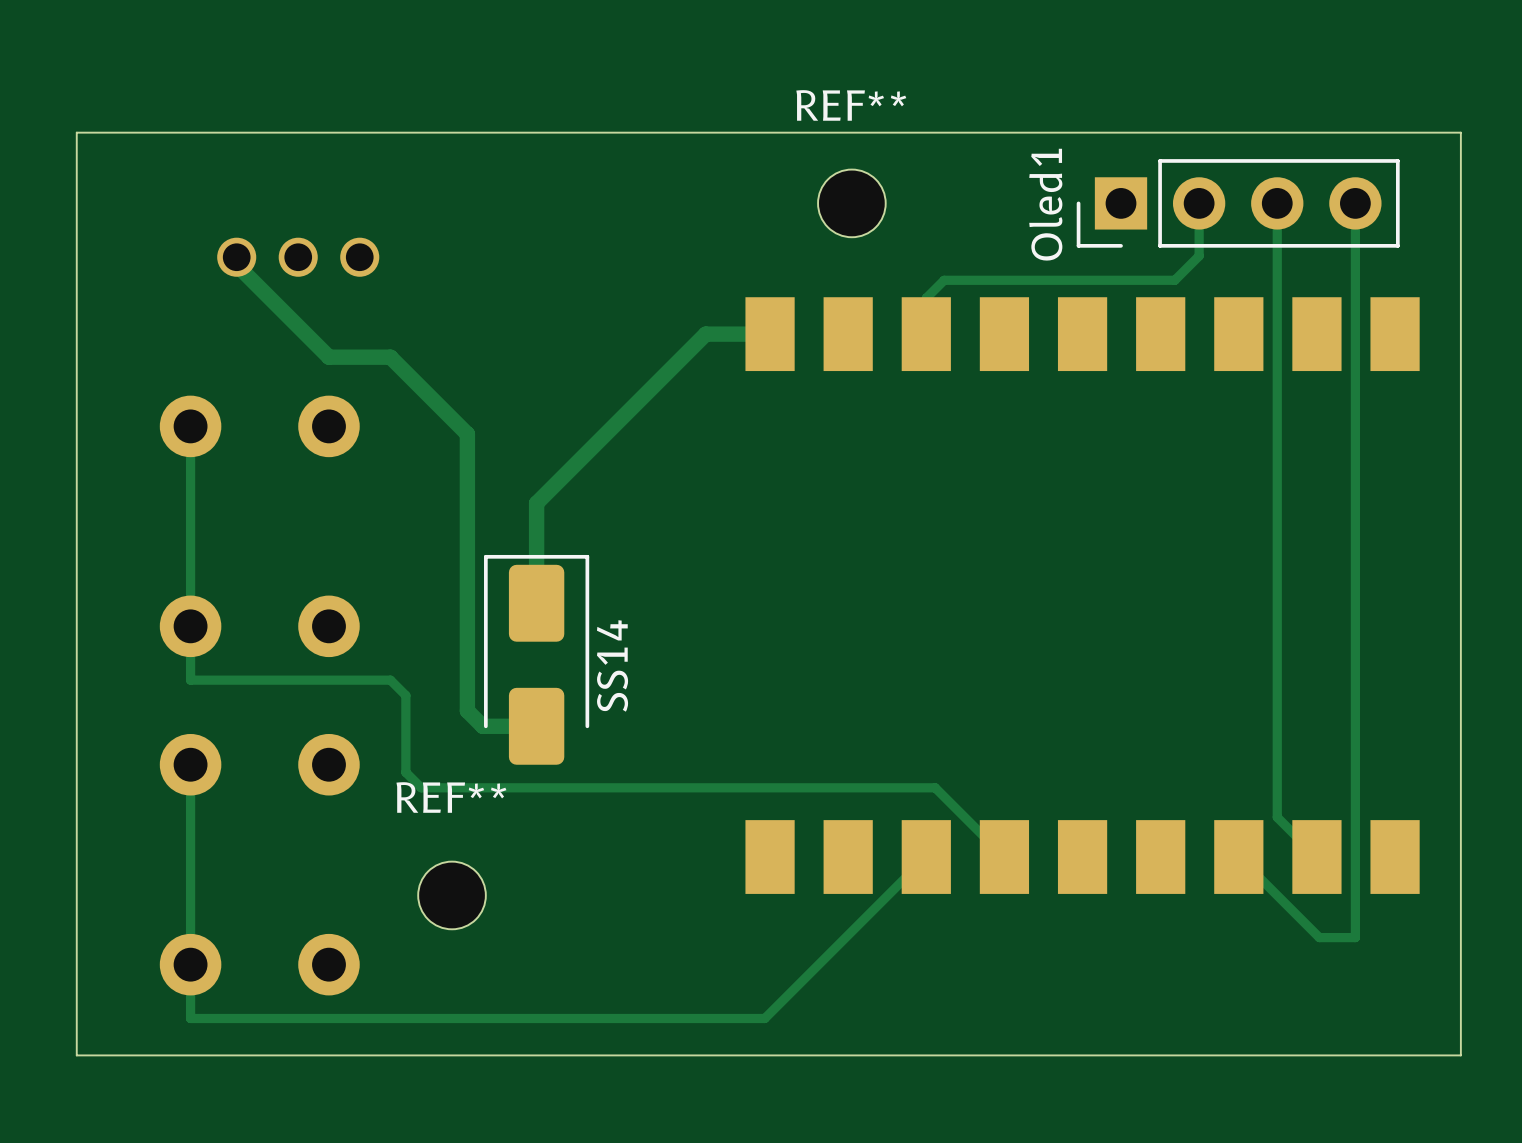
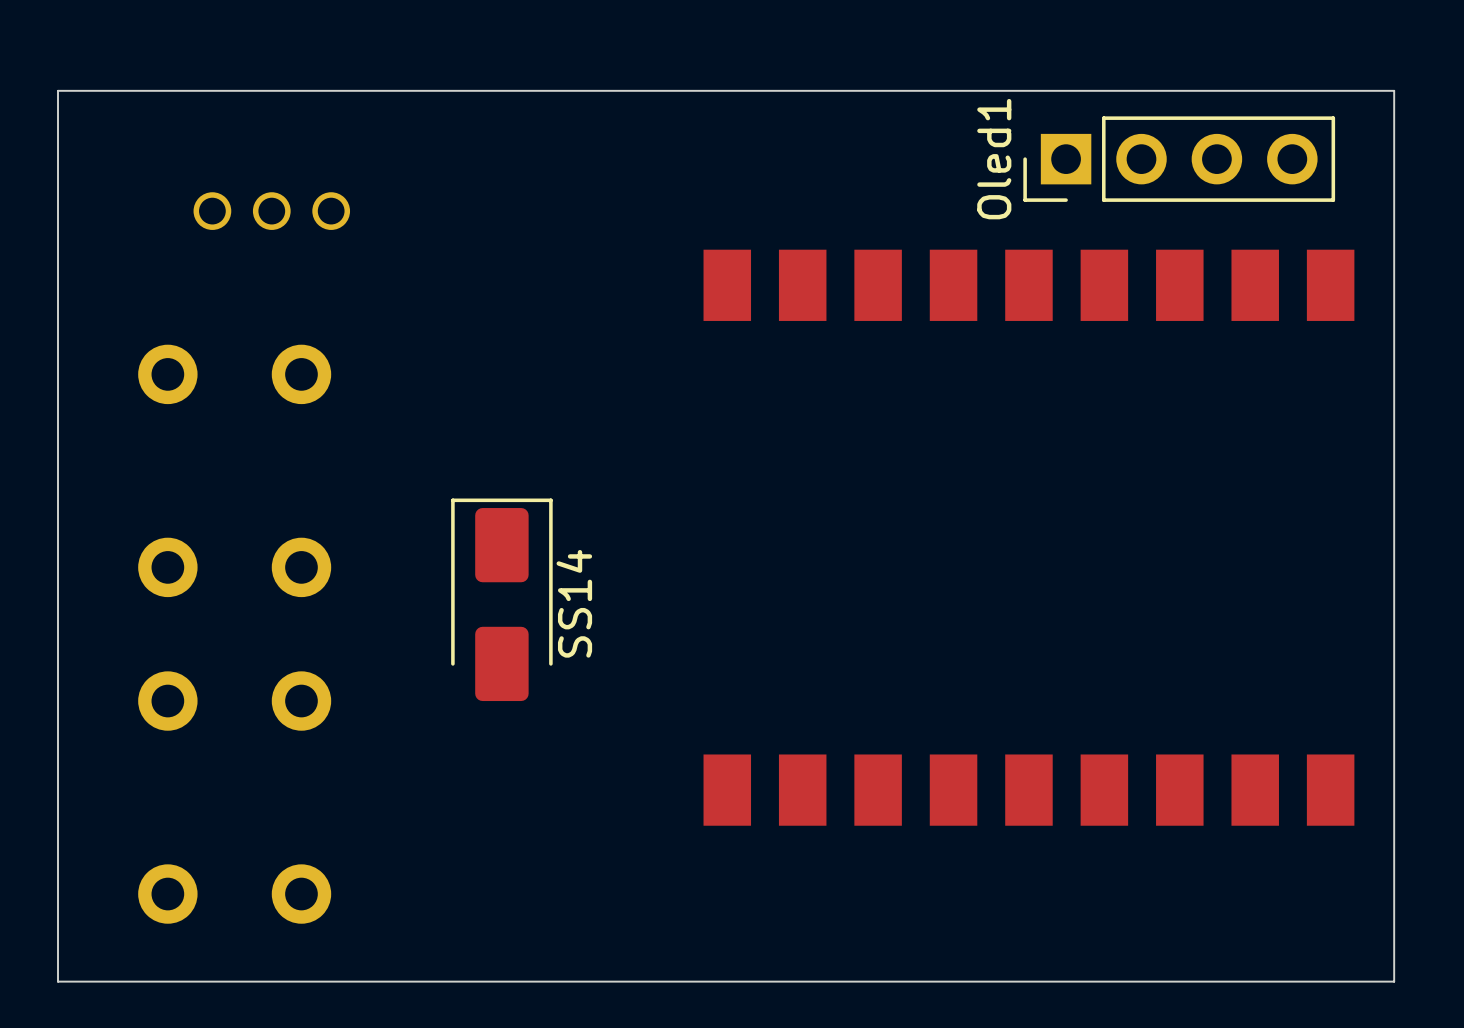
REF**: (851, 203) -> none
track: (1199, 203) (1199, 256) (1174, 280) (944, 280) (926, 298) (926, 334) -> none
track: (1277, 203) (1277, 817) (1316, 857) -> none
track: (1355, 203) (1355, 937) (1319, 937) (1238, 857) -> none
track: (236, 257) (236, 264) (328, 357) (390, 357) (467, 434) (467, 710) (482, 726) (536, 726) -> none
track: (770, 334) (705, 334) (536, 503) (536, 603) (528, 595) -> none
track: (190, 426) (190, 680) (390, 680) (405, 695) (405, 772) (421, 787) (935, 787) (1004, 857) -> none
track: (190, 764) (190, 1018) (764, 1018) (926, 857) -> none
REF**: (452, 895) -> none

